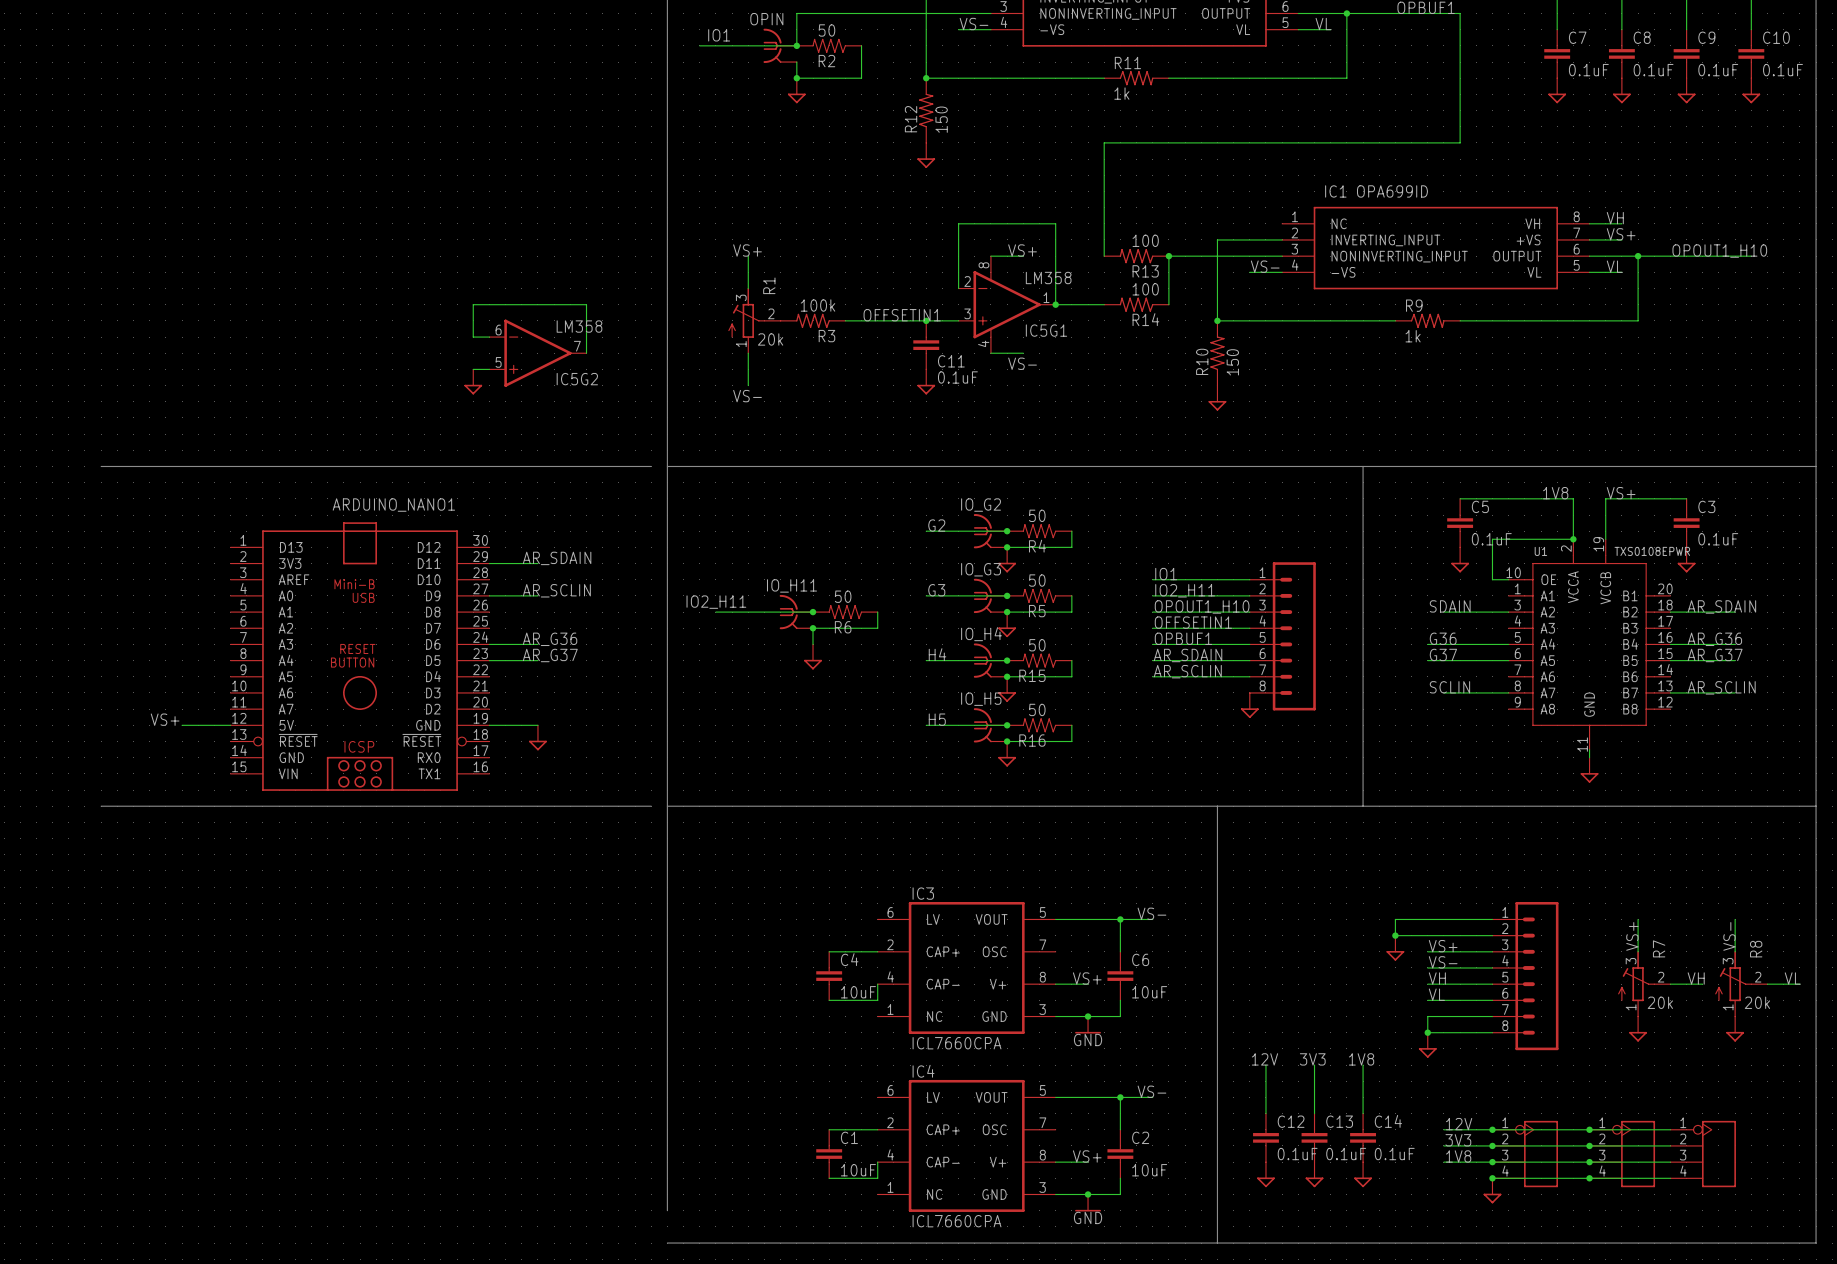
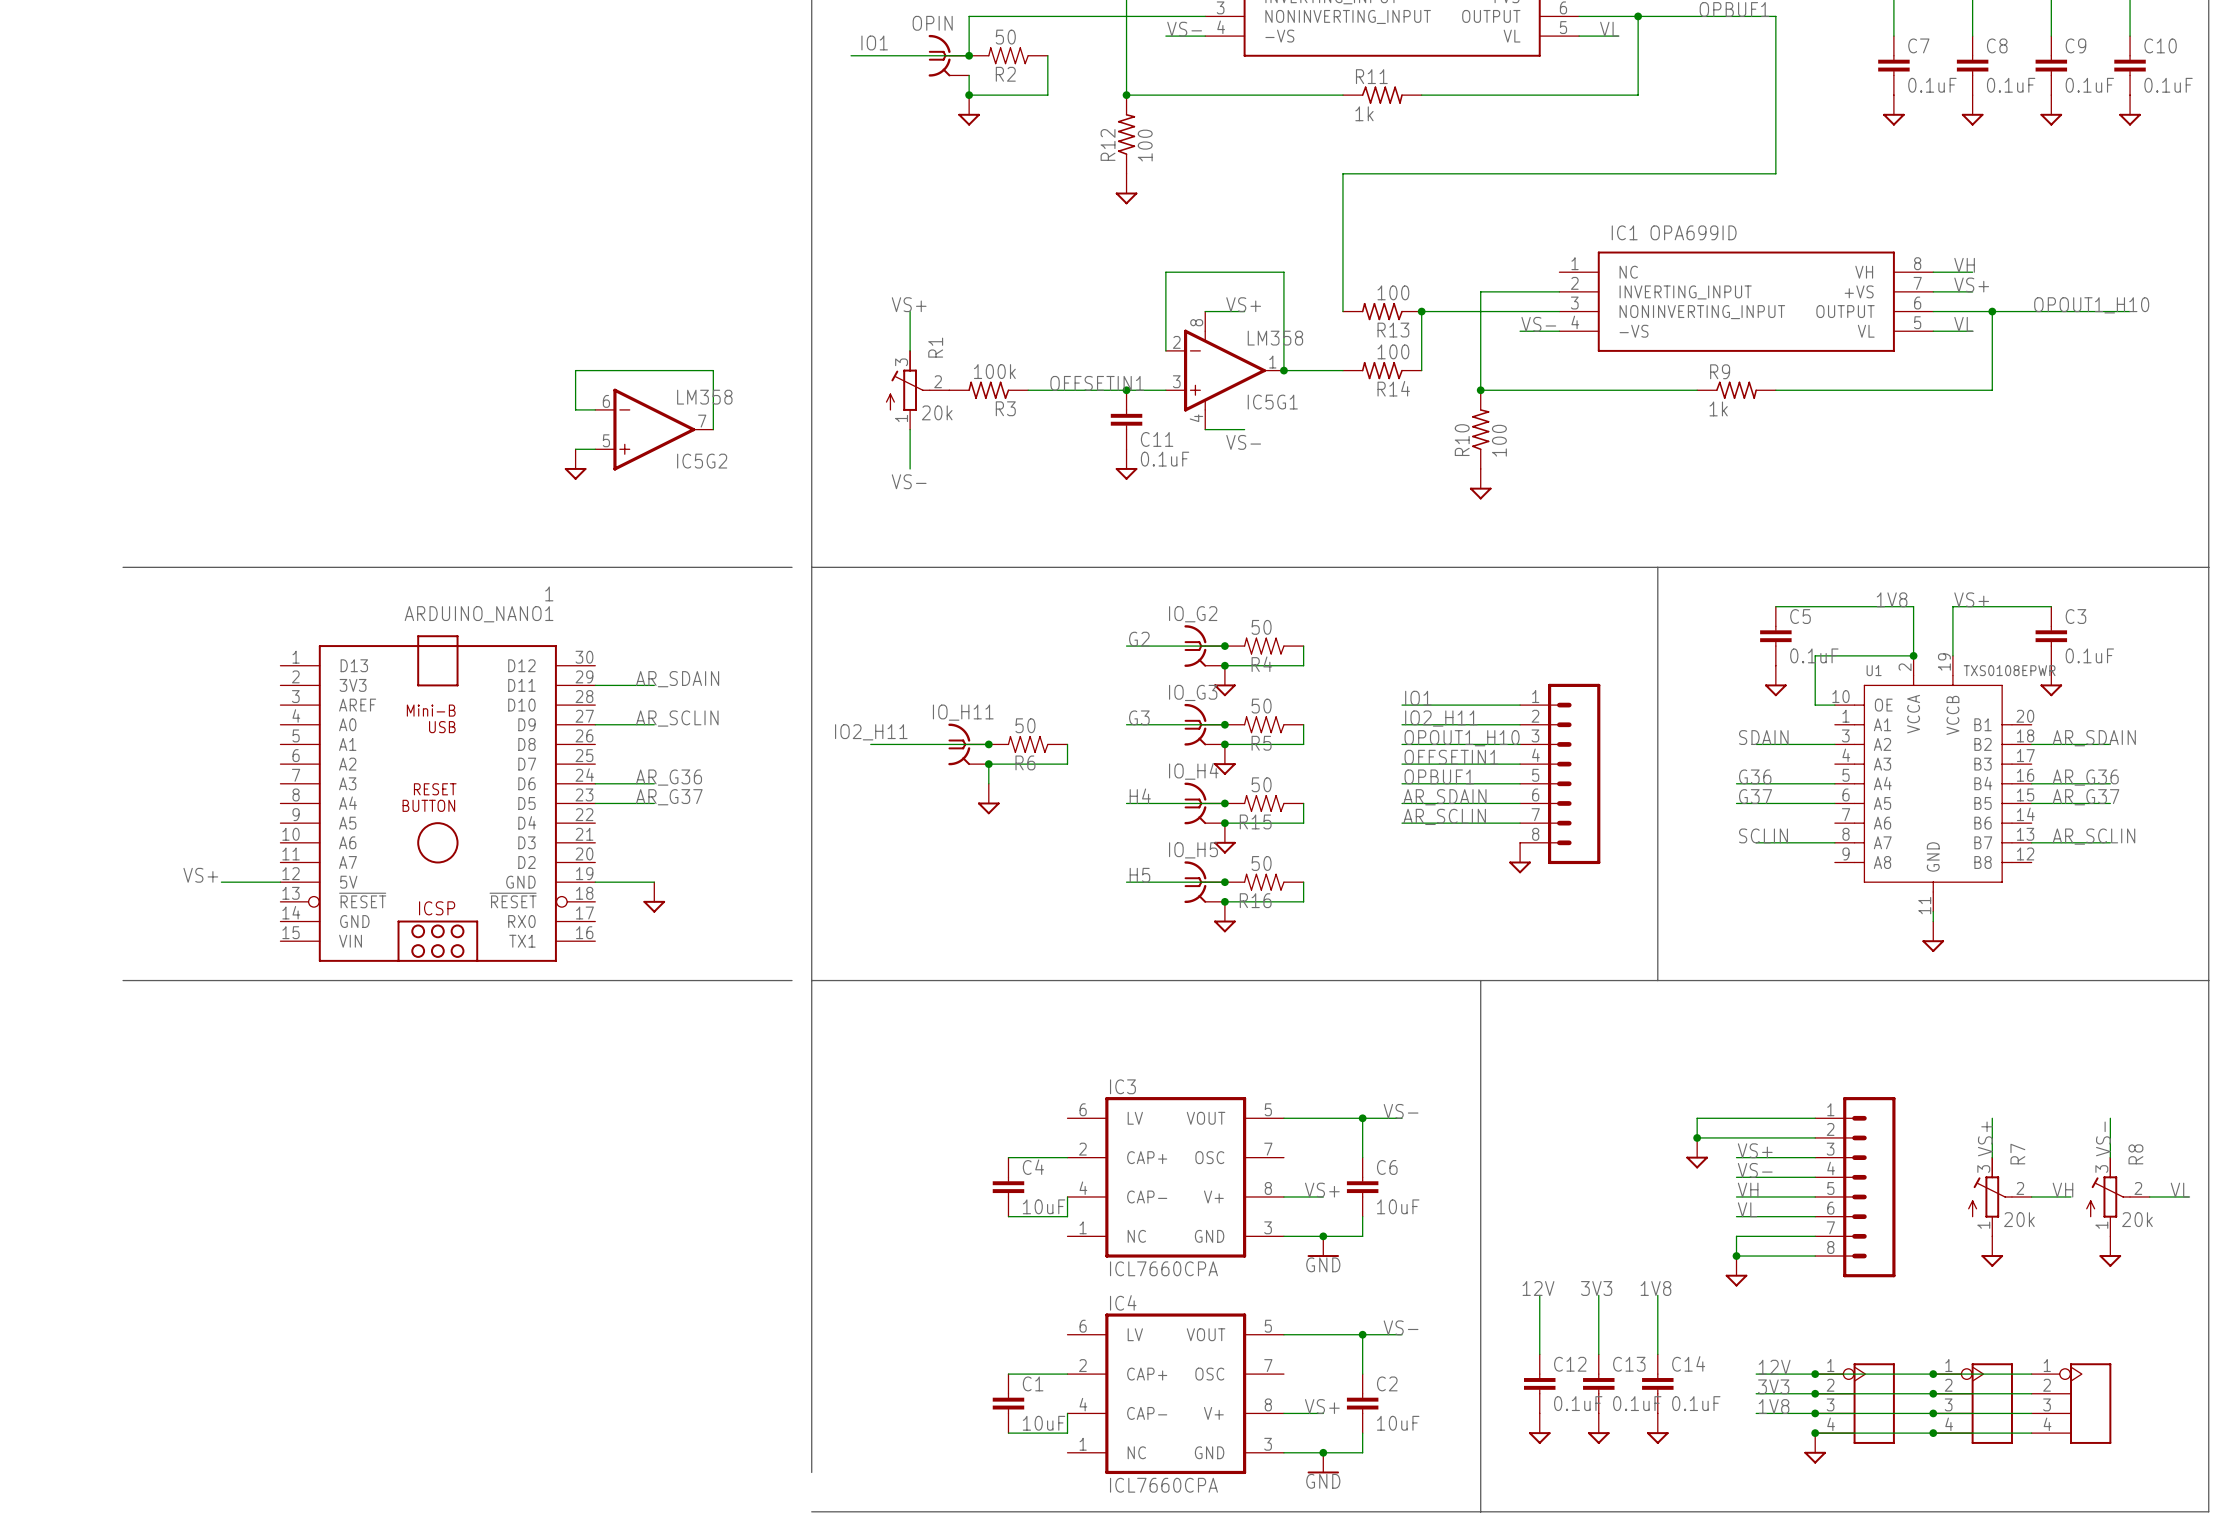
R12 value: 150 (941, 119) -> 100 (1145, 145)
R10 value: 150 (1232, 362) -> 100 (1499, 440)
ARDUINO_NANO1 value: none -> 1 (549, 593)

